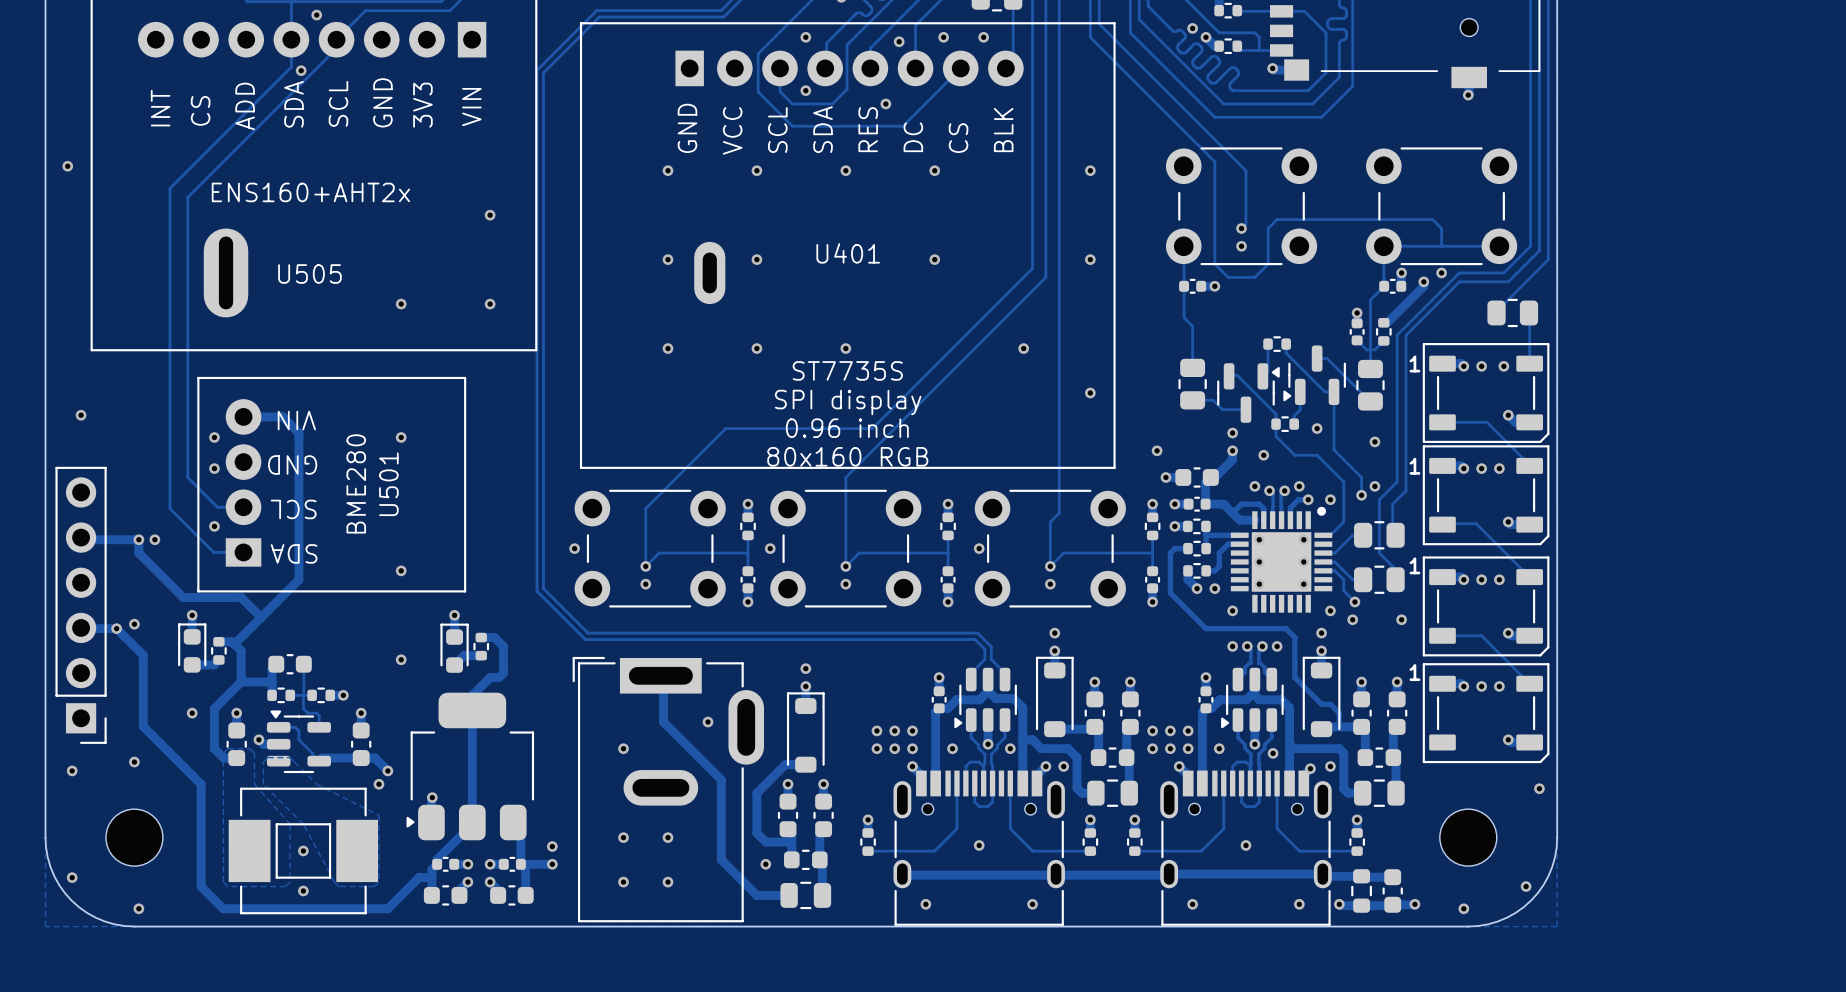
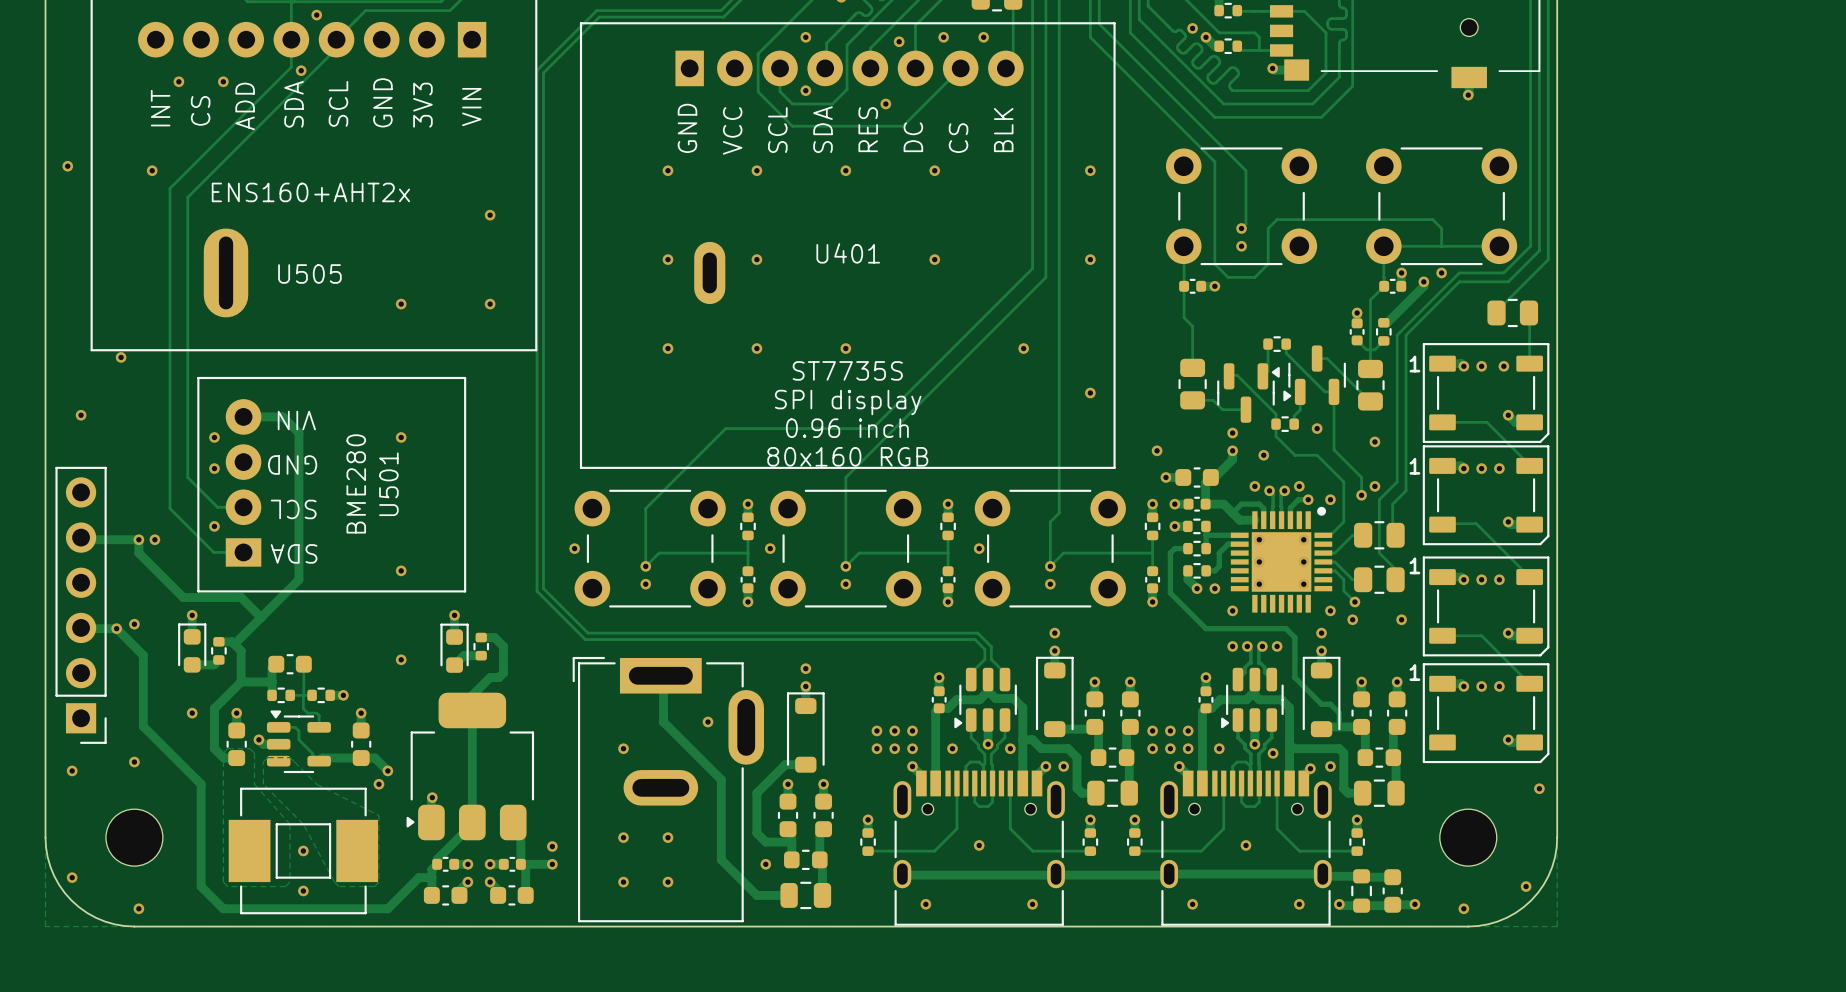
via: none -> (178, 81)
via: none -> (223, 81)
via: none -> (152, 170)
via: none -> (121, 357)

